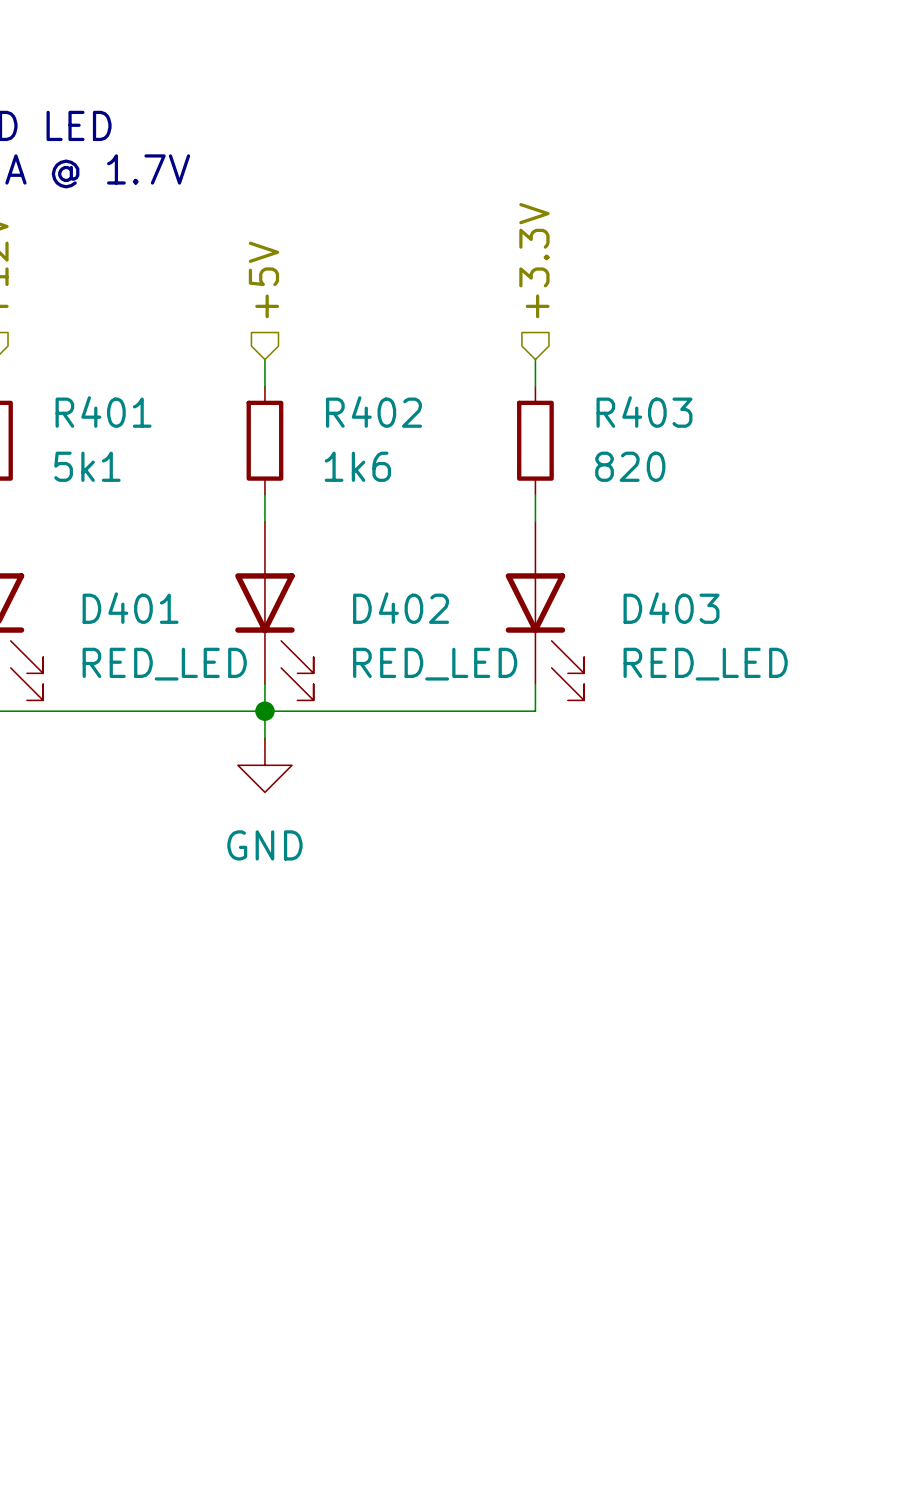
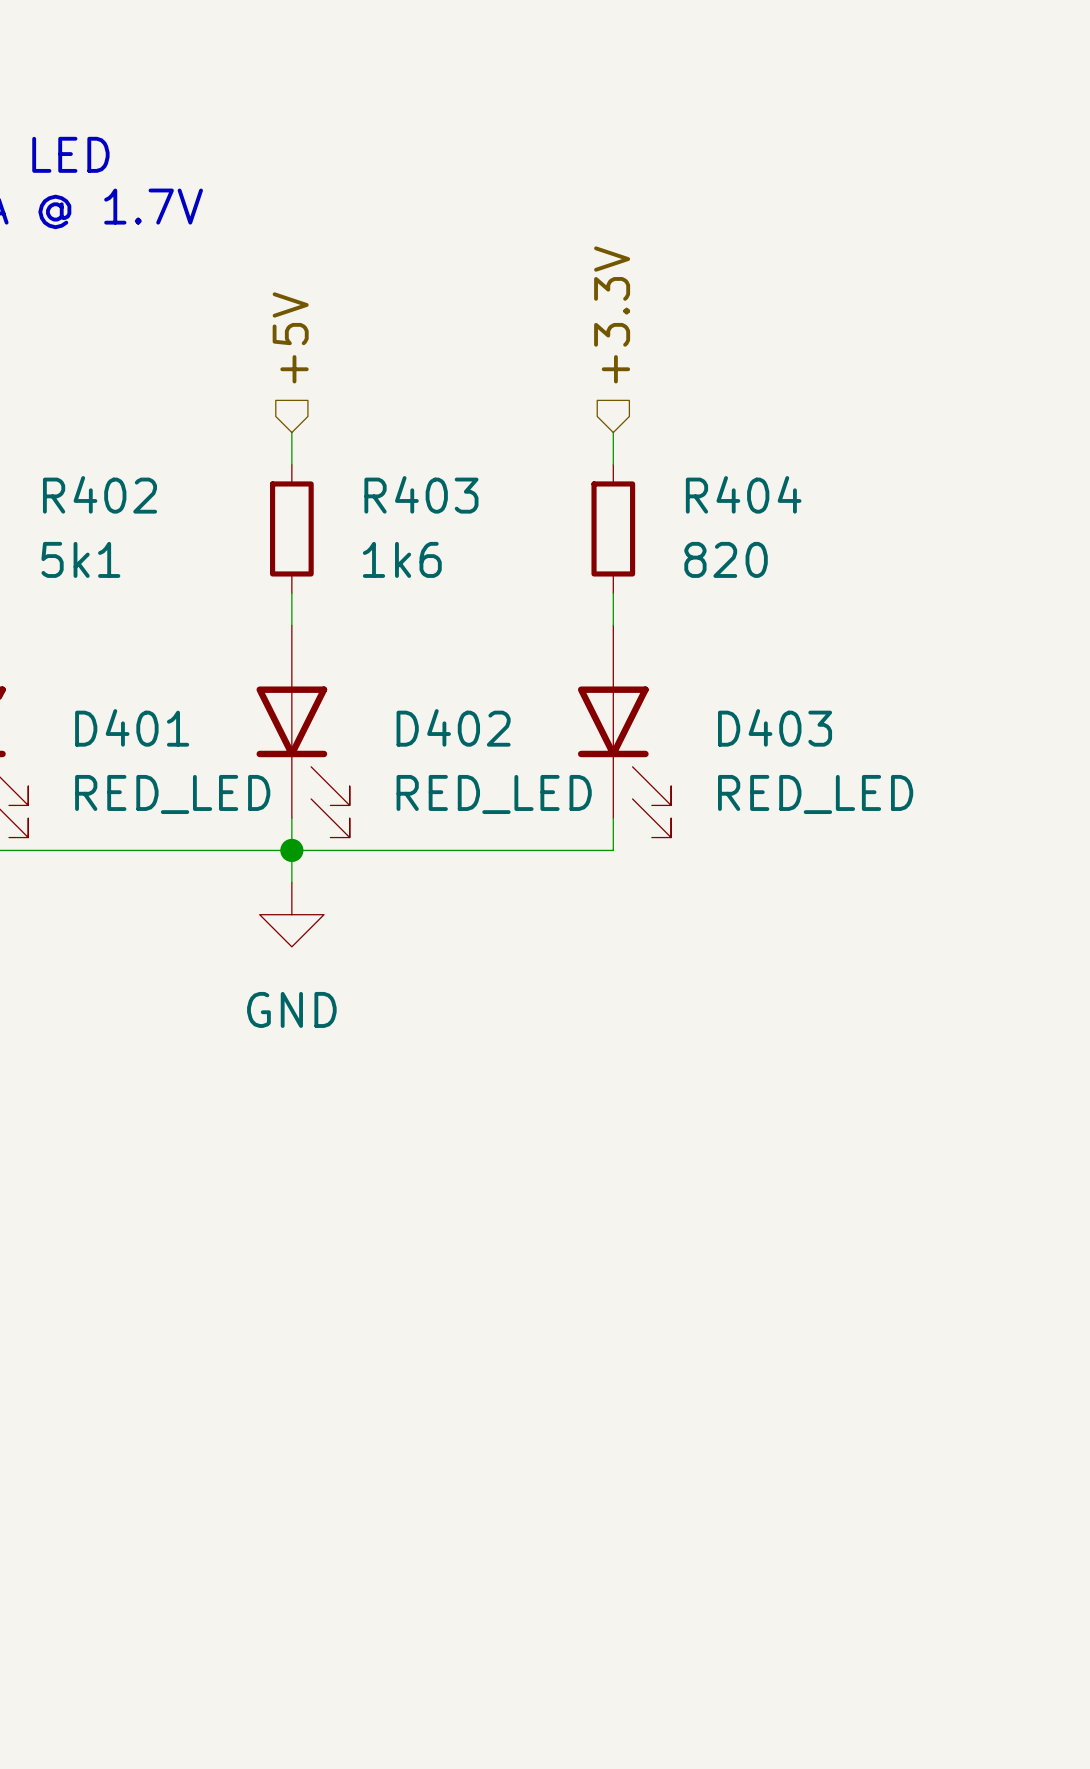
R401 name: R401 (103, 412) -> R402 (100, 494)
R402 name: R402 (373, 412) -> R403 (421, 494)
R403 name: R403 (644, 412) -> R404 (743, 494)

